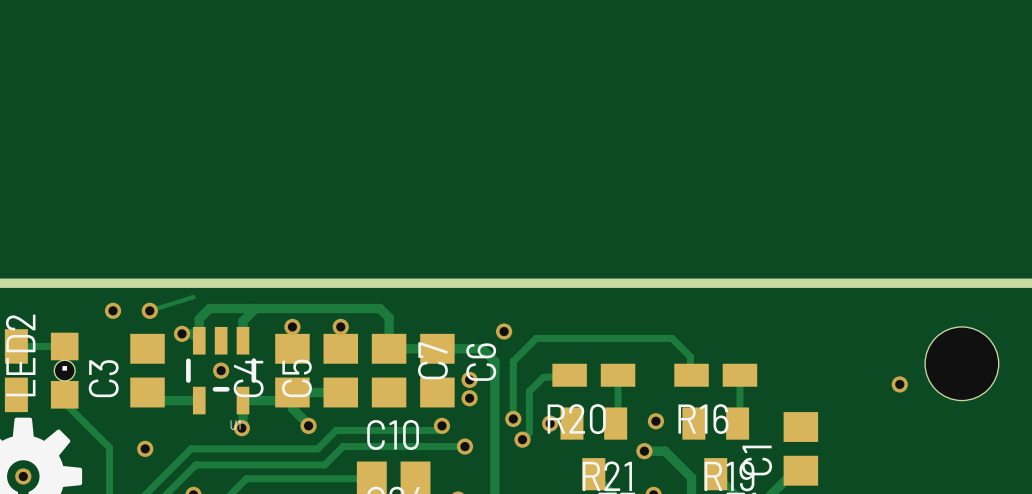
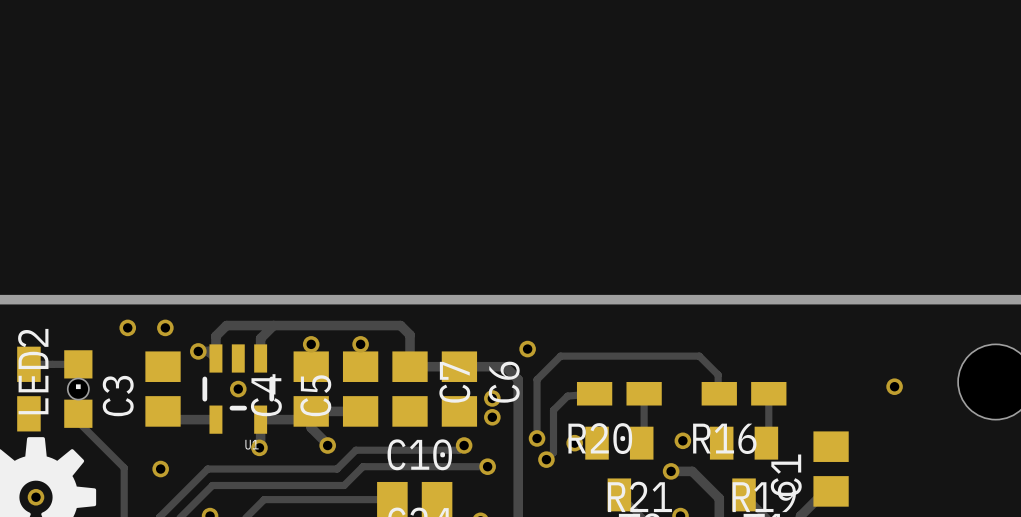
track: (193, 297) (149, 310) -> none
via position: (899, 384) -> (894, 386)

